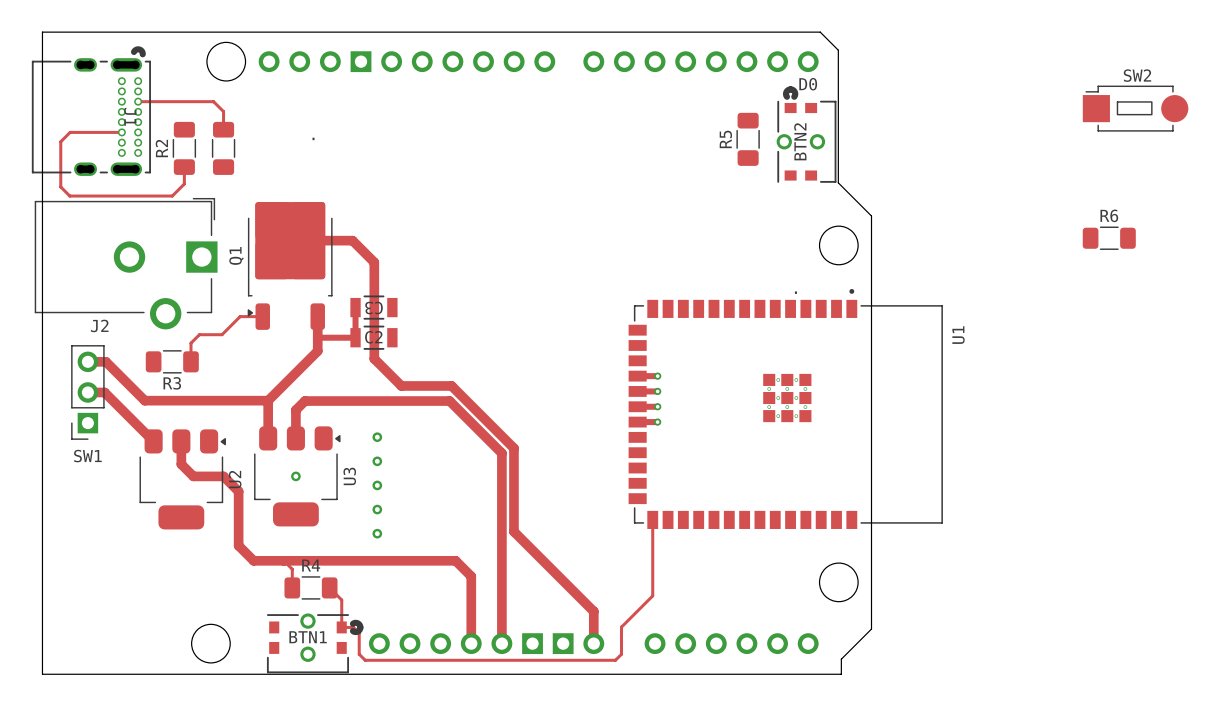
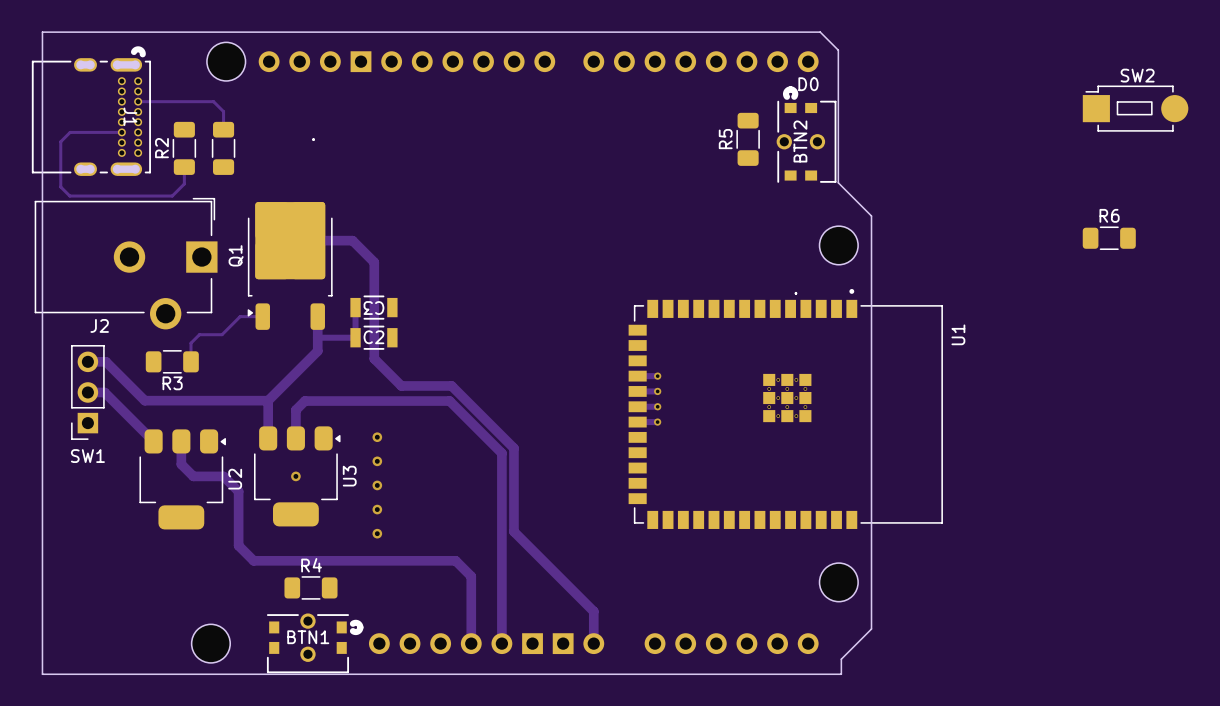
track: (652, 519) (652, 595) (621, 627) (621, 654) (615, 660) (365, 660) (359, 654) (359, 633) (353, 627) (341, 627) (341, 600) (329, 587) -> none
track: (283, 560) (292, 569) (292, 587) -> none

